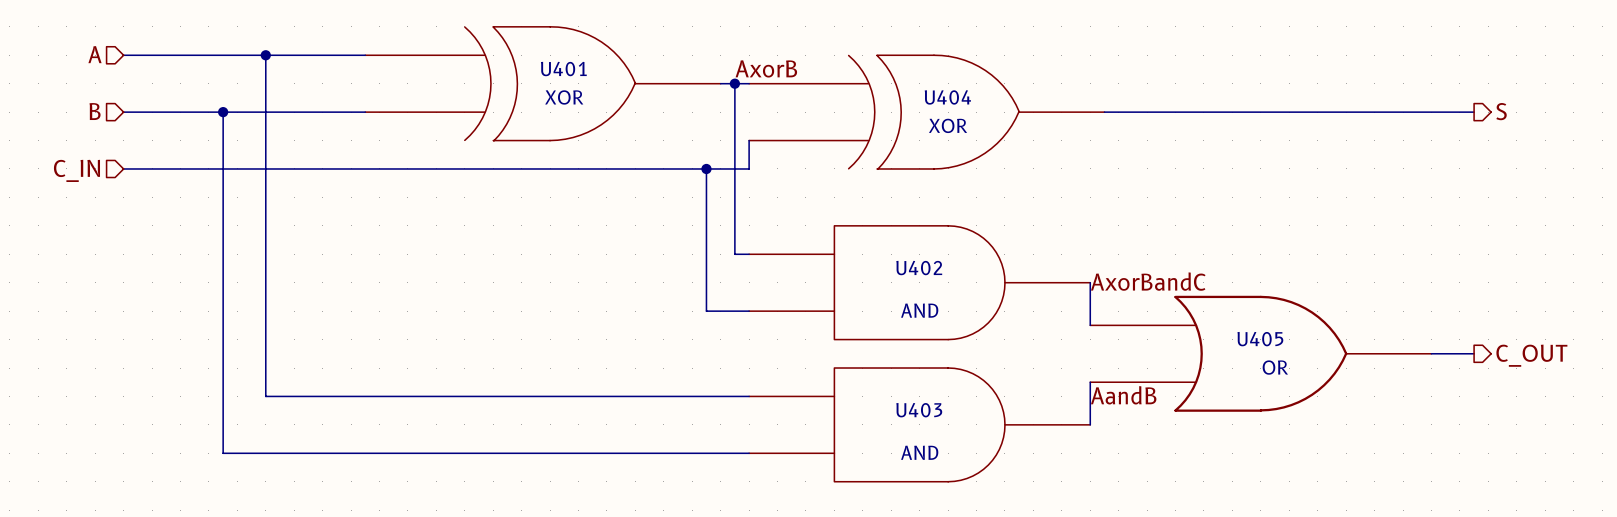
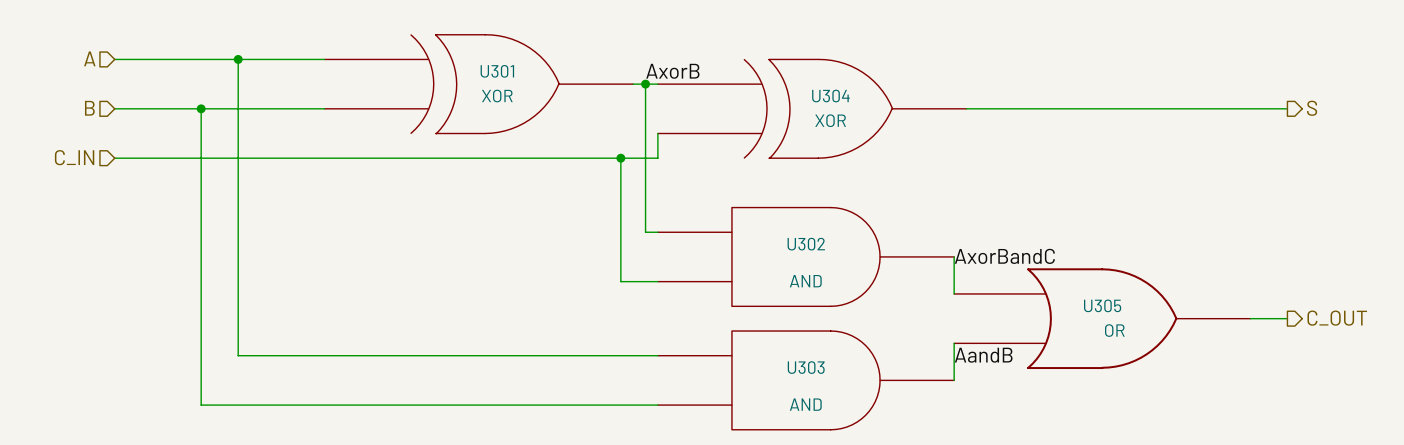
U401 name: U401 (563, 69) -> U301 (497, 71)
U404 name: U404 (947, 97) -> U304 (830, 96)
U402 name: U402 (919, 268) -> U302 (806, 244)
U405 name: U405 (1260, 339) -> U305 (1102, 305)
U403 name: U403 (919, 410) -> U303 (806, 367)

